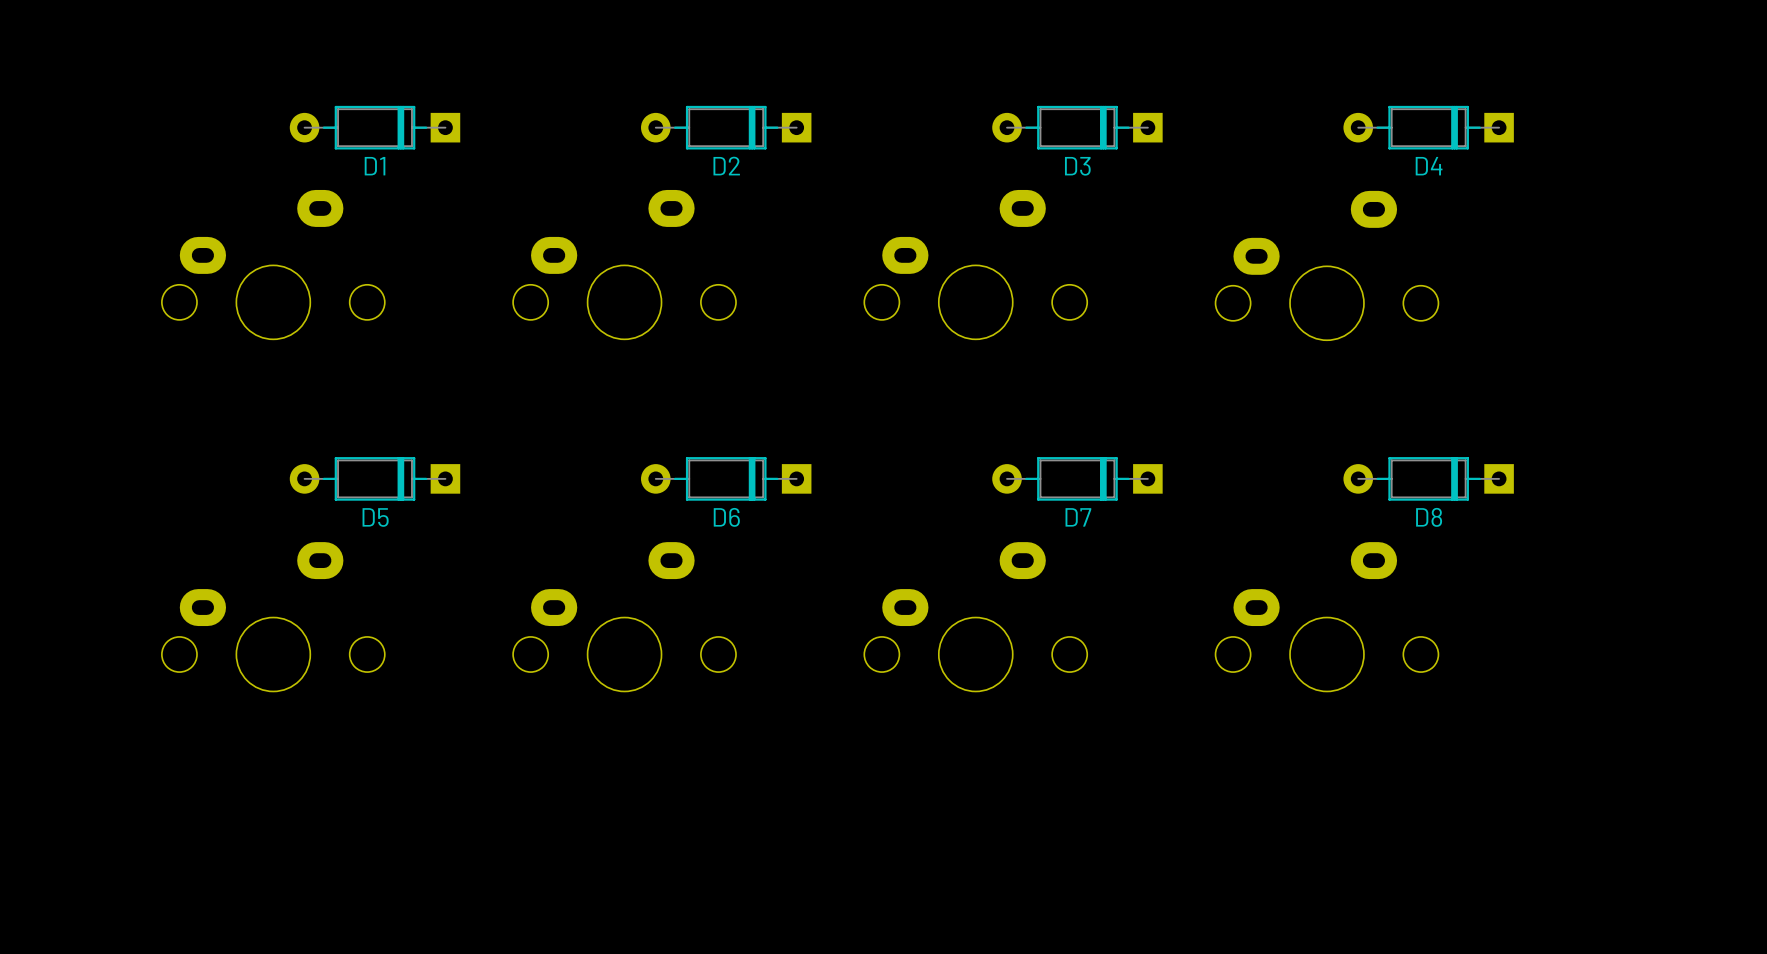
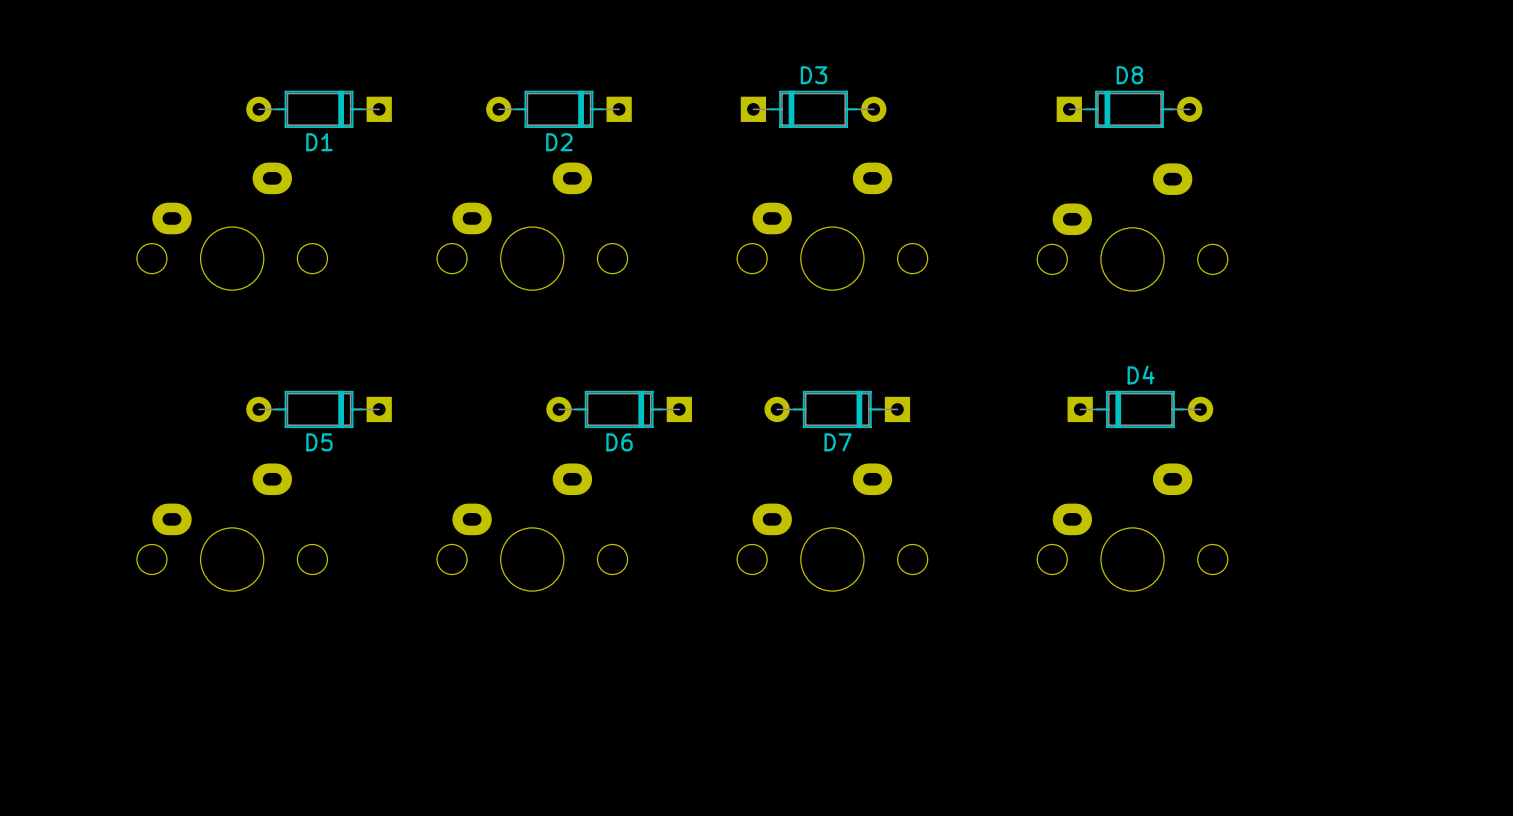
D2 position: (726, 127) -> (558, 109)
D3 rotation: 0° (1077, 127) -> 180° (813, 109)
D3 position: (1077, 127) -> (813, 109)
D4 rotation: 0° (1428, 127) -> 180° (1140, 409)
D4 position: (1428, 127) -> (1140, 409)
D7 position: (1077, 478) -> (837, 409)
D8 rotation: 0° (1428, 478) -> 180° (1129, 109)
D8 position: (1428, 478) -> (1129, 109)

